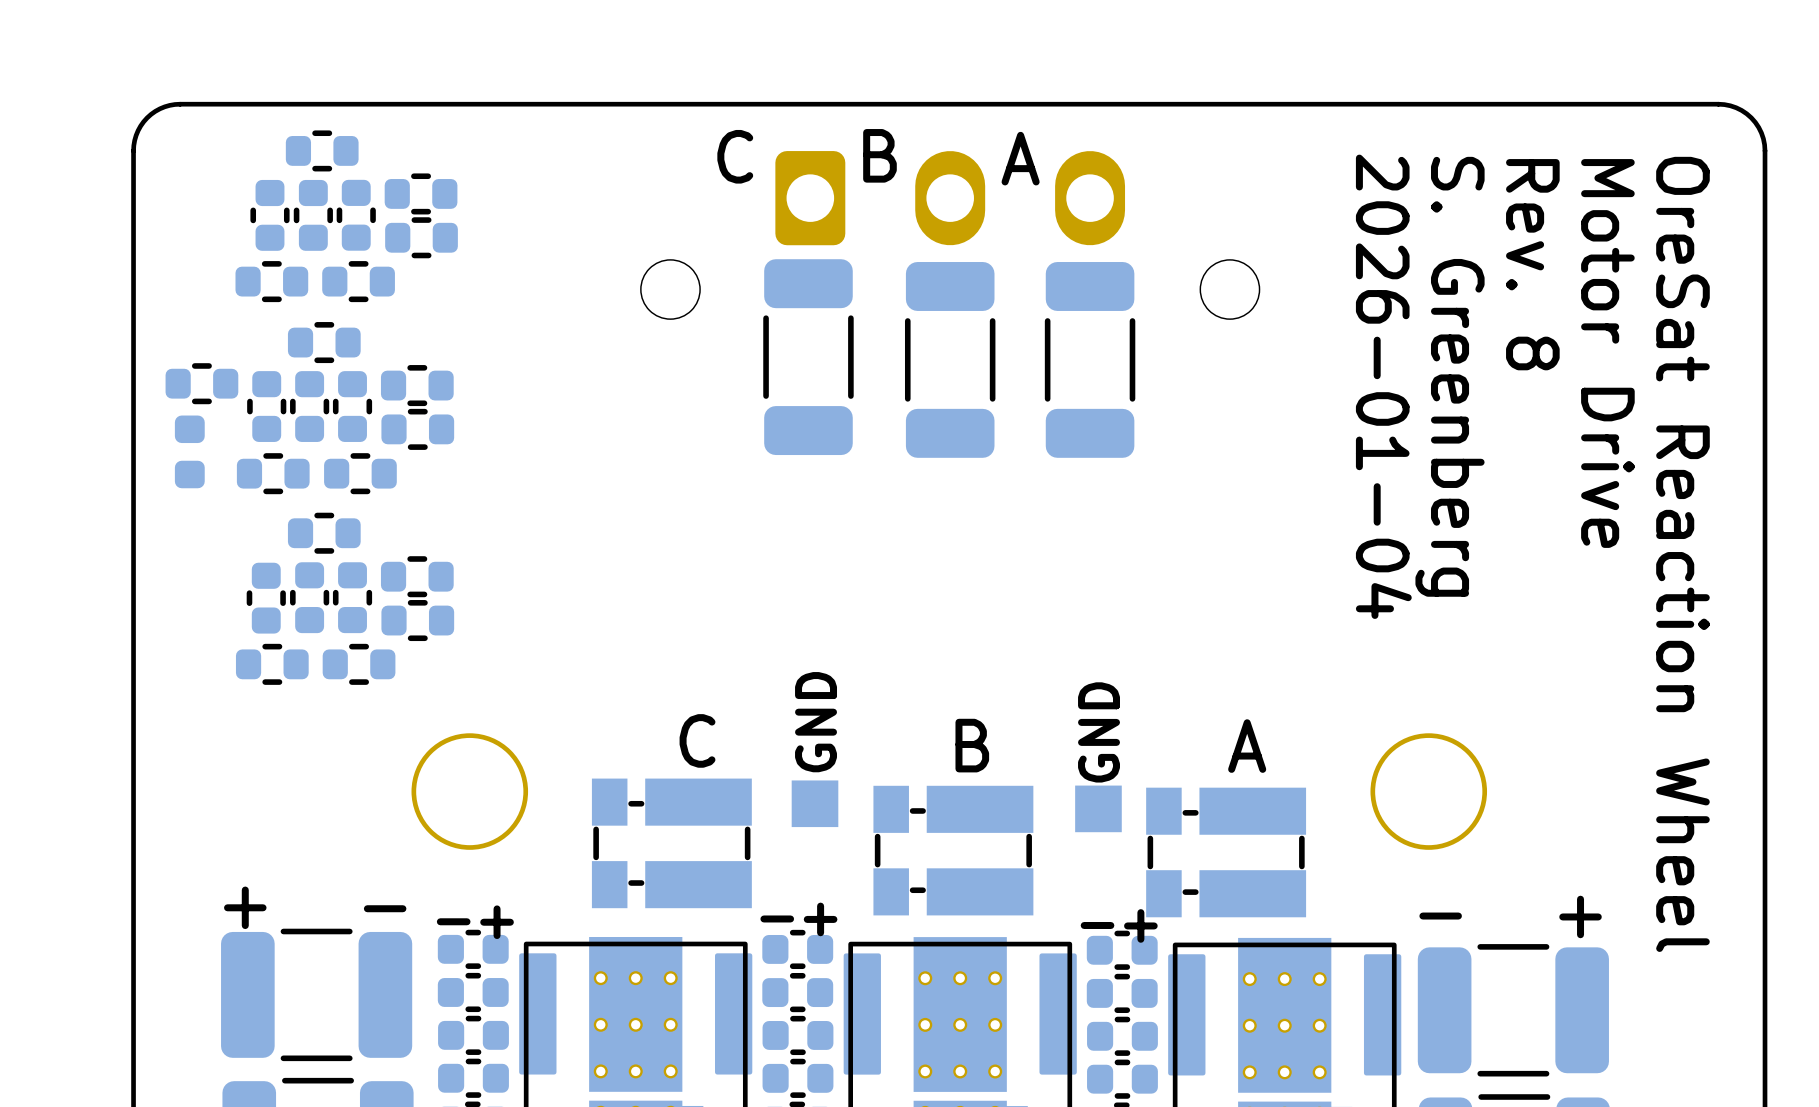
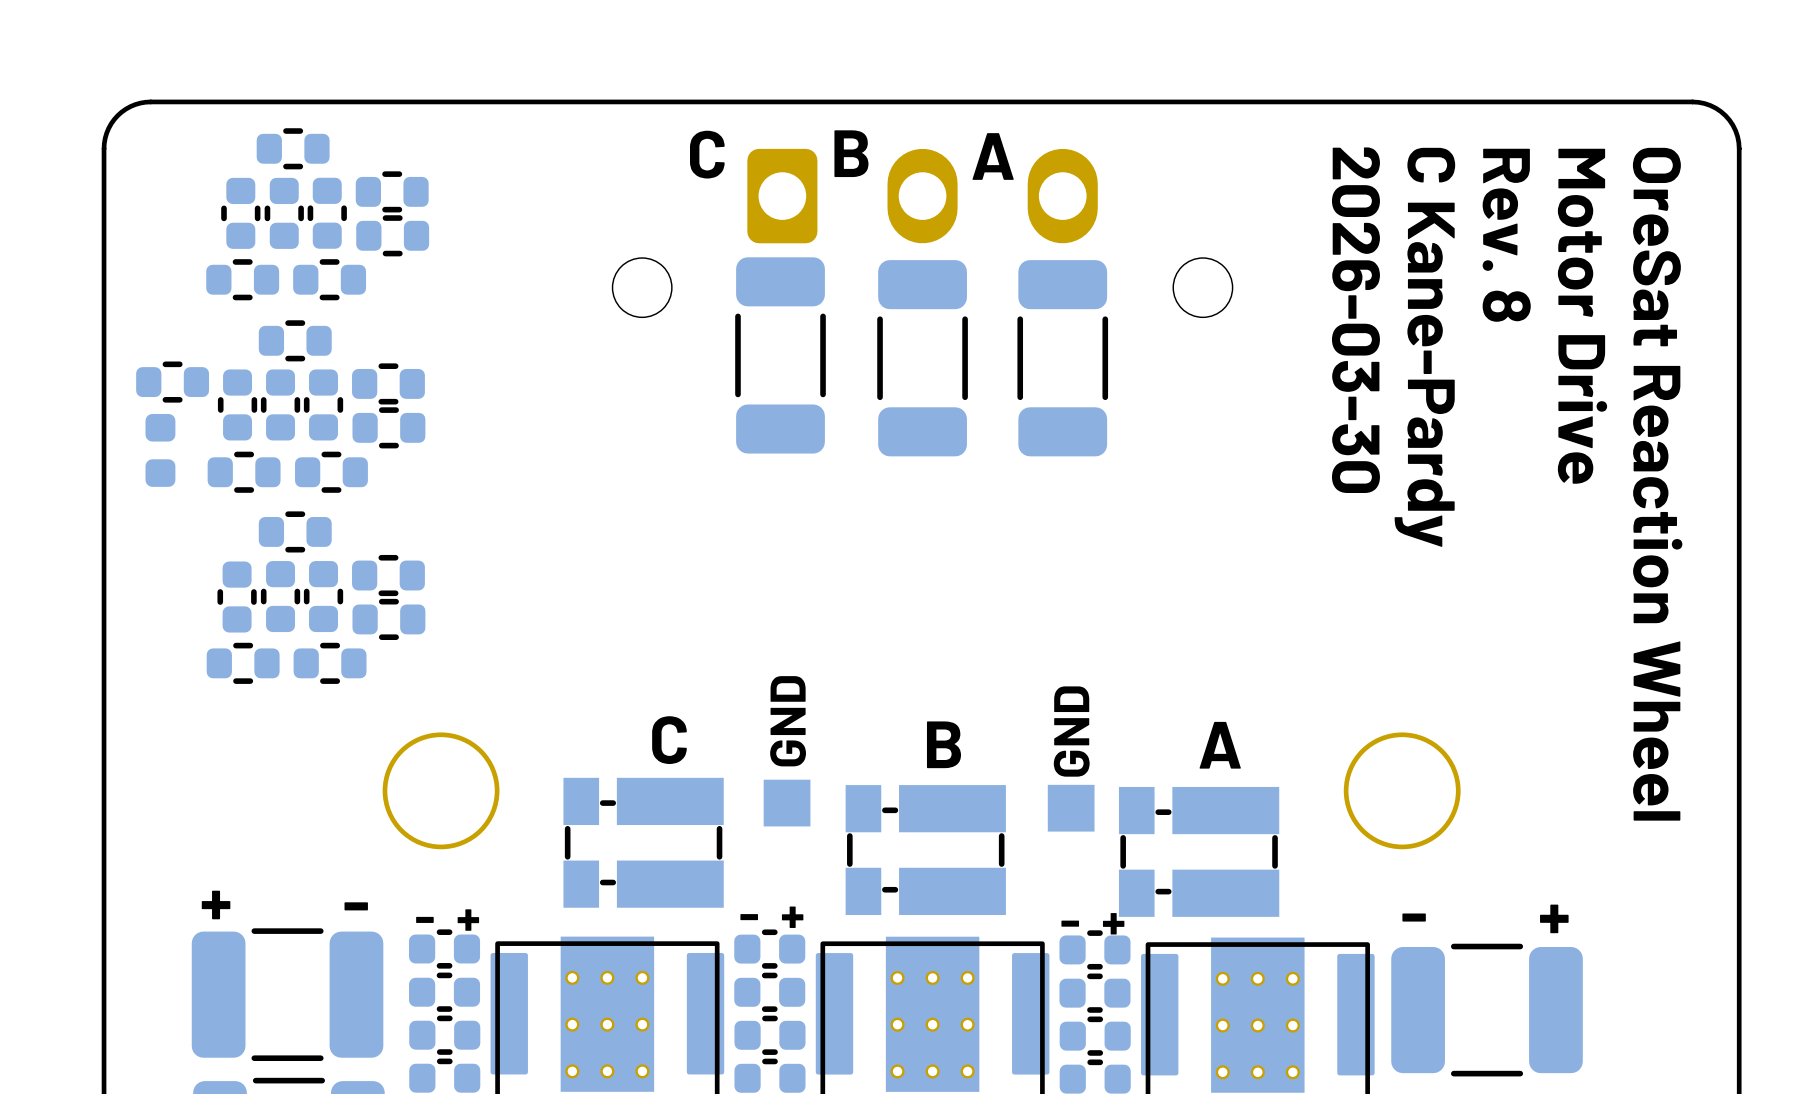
text: S. Greenberg (1450, 376) -> C Kane-Pardy (1424, 347)
text: 2026-01-04 (1383, 386) -> 2026-03-30 (1355, 320)

